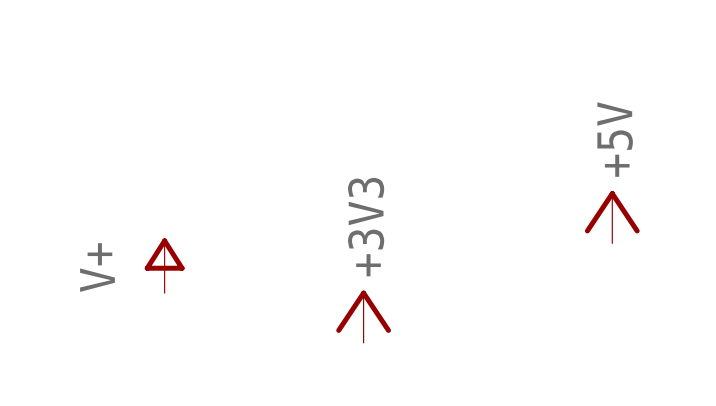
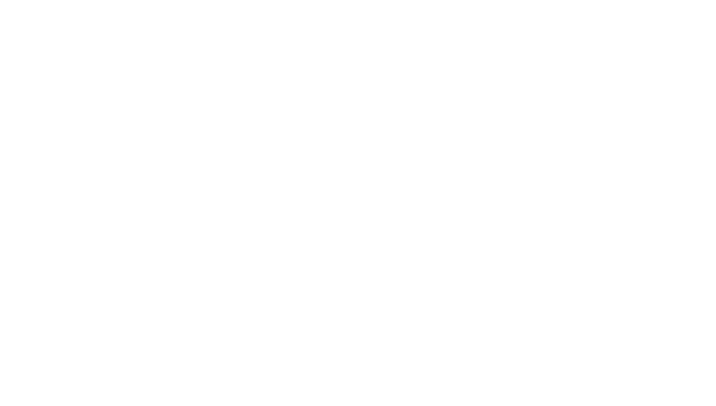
power symbol: +5V (612, 217) -> none
power symbol: V+ (164, 265) -> none
power symbol: +3V3 (363, 316) -> none

